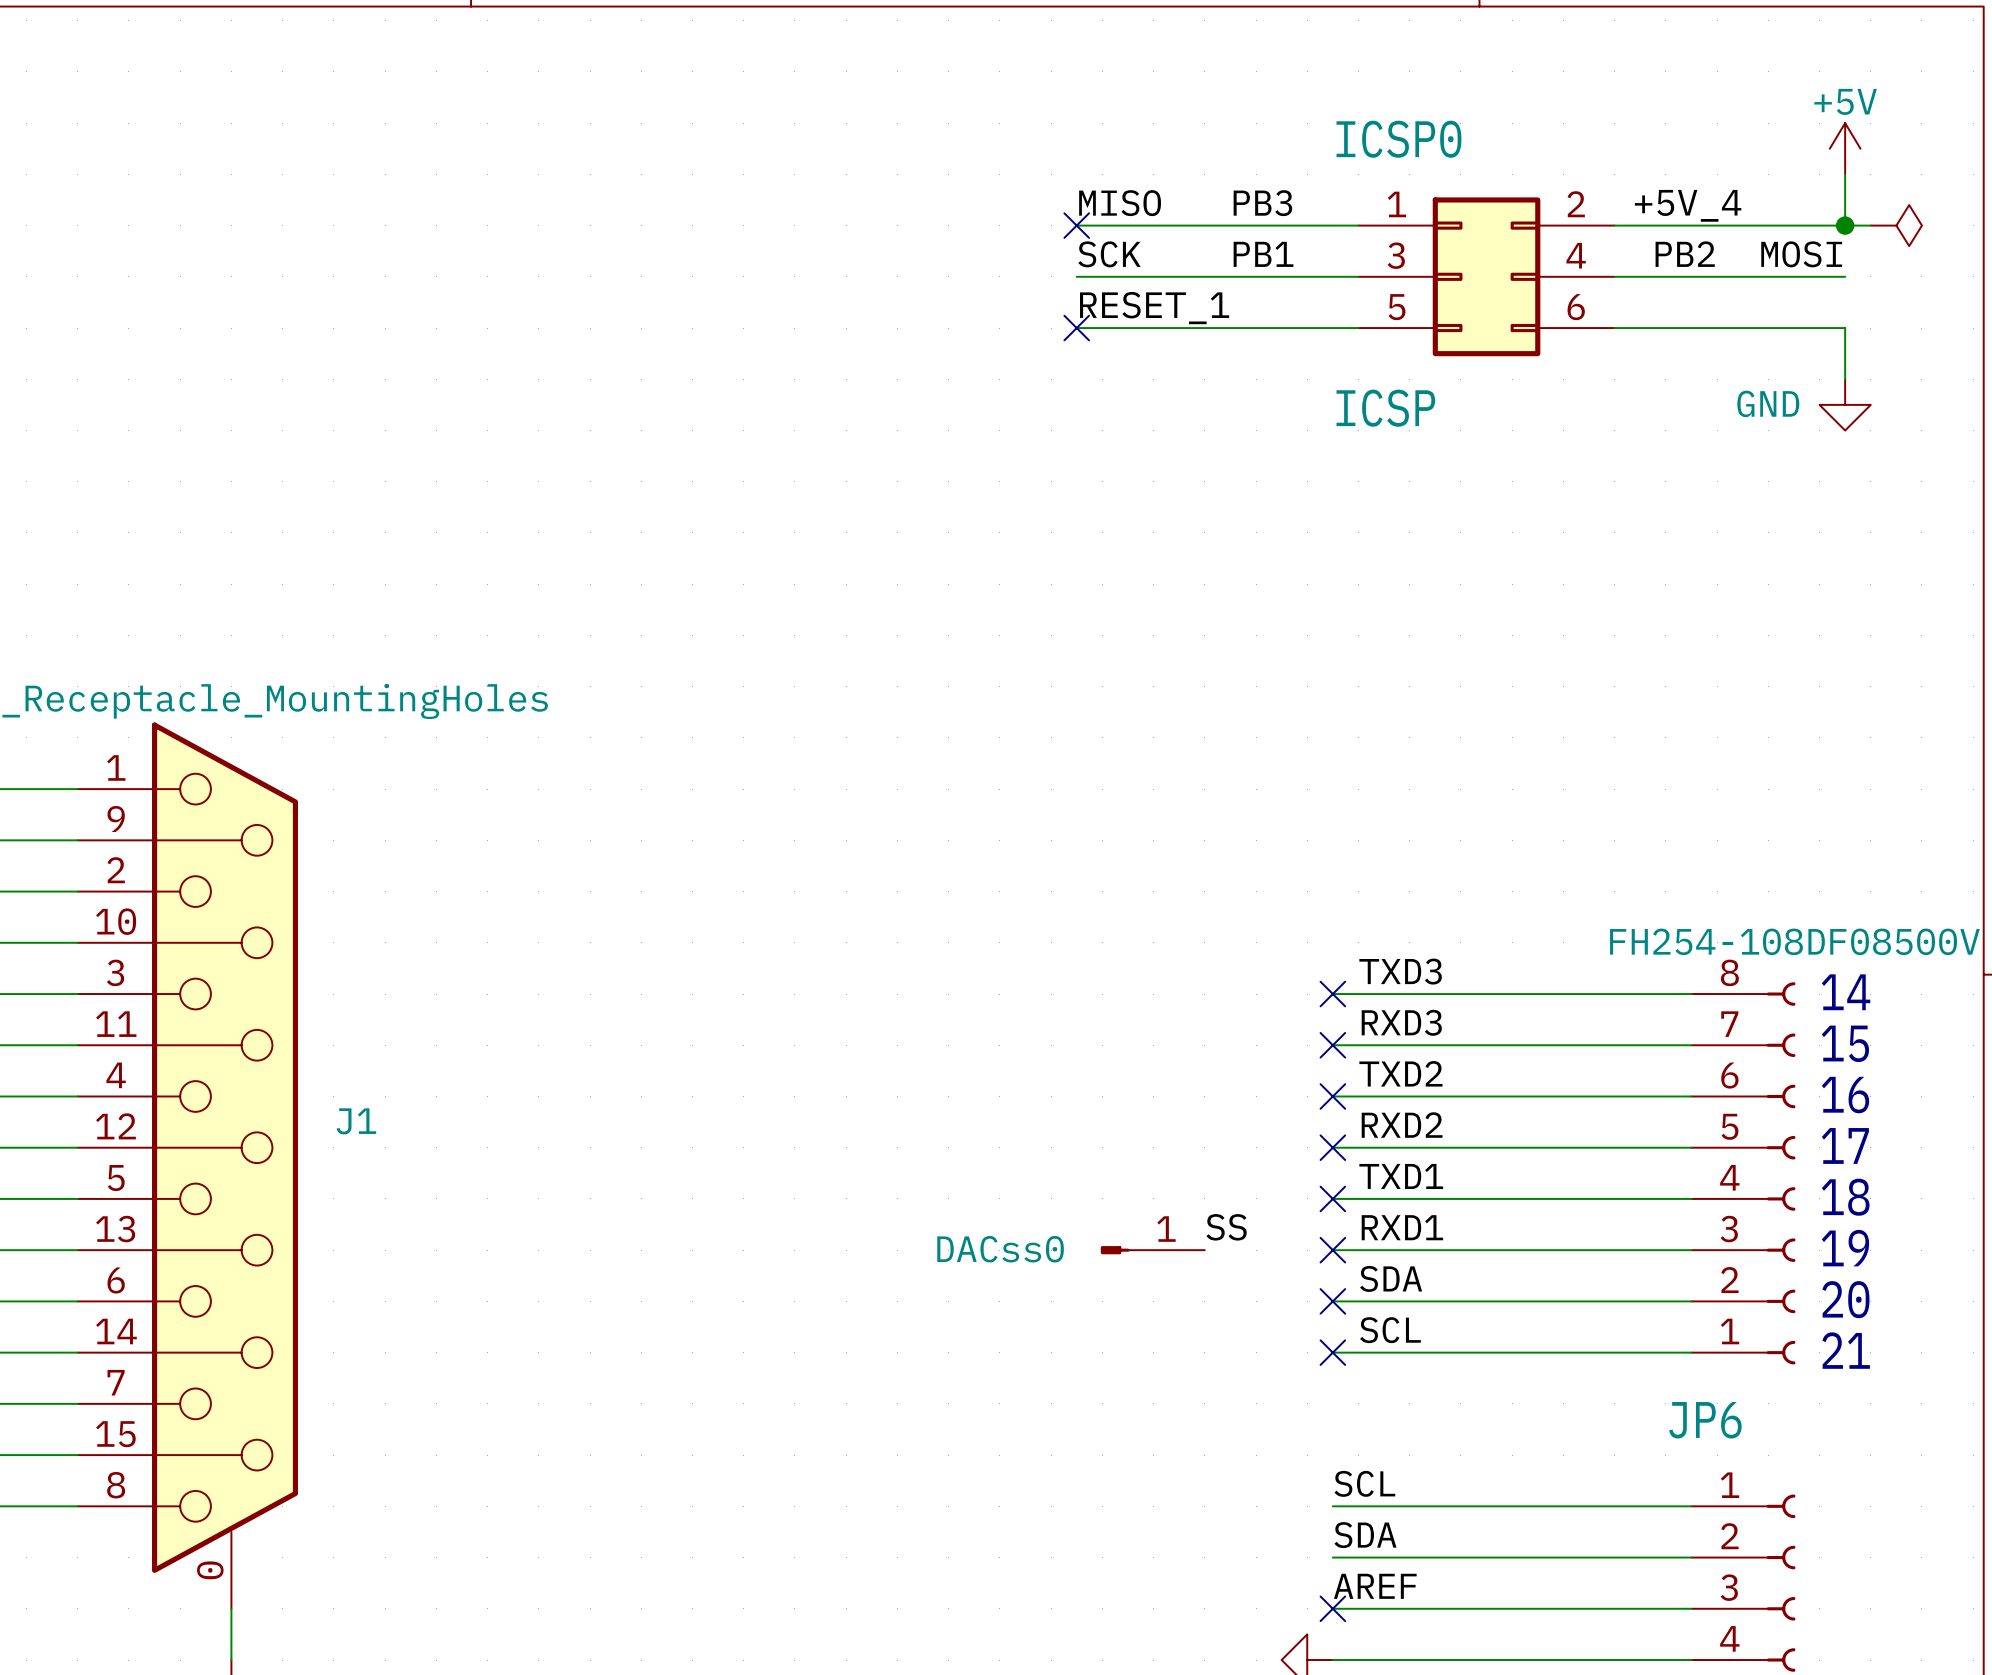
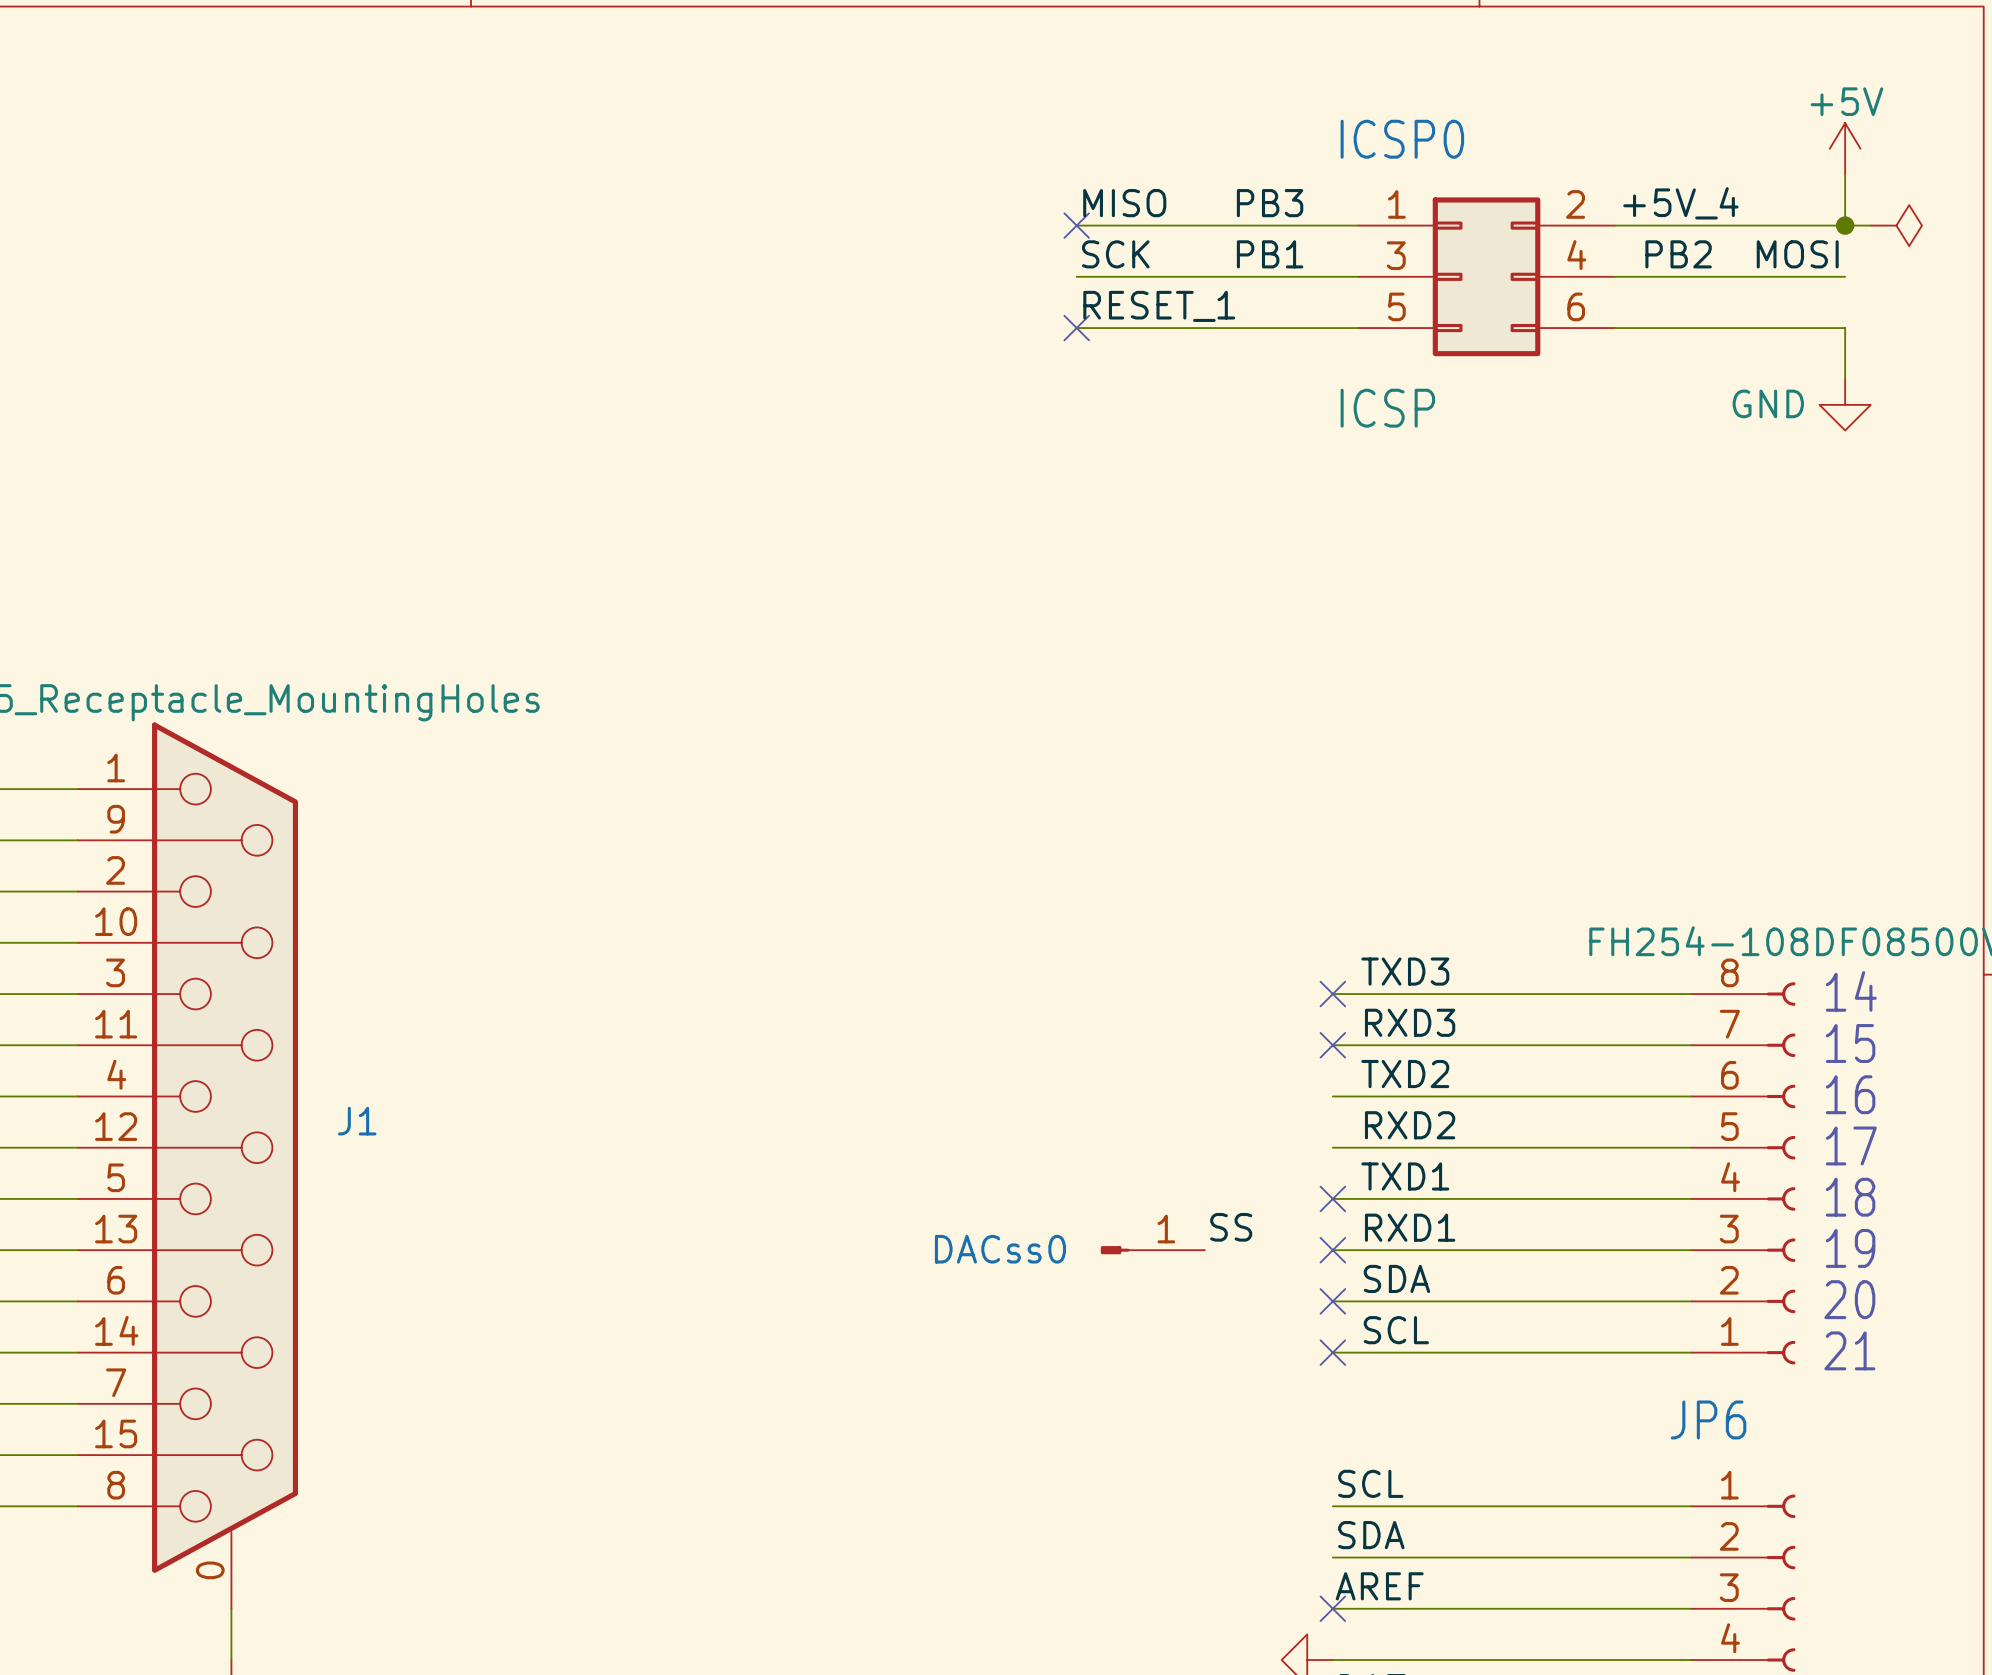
no-connect mark: (1332, 1096) -> none
no-connect mark: (1332, 1147) -> none

